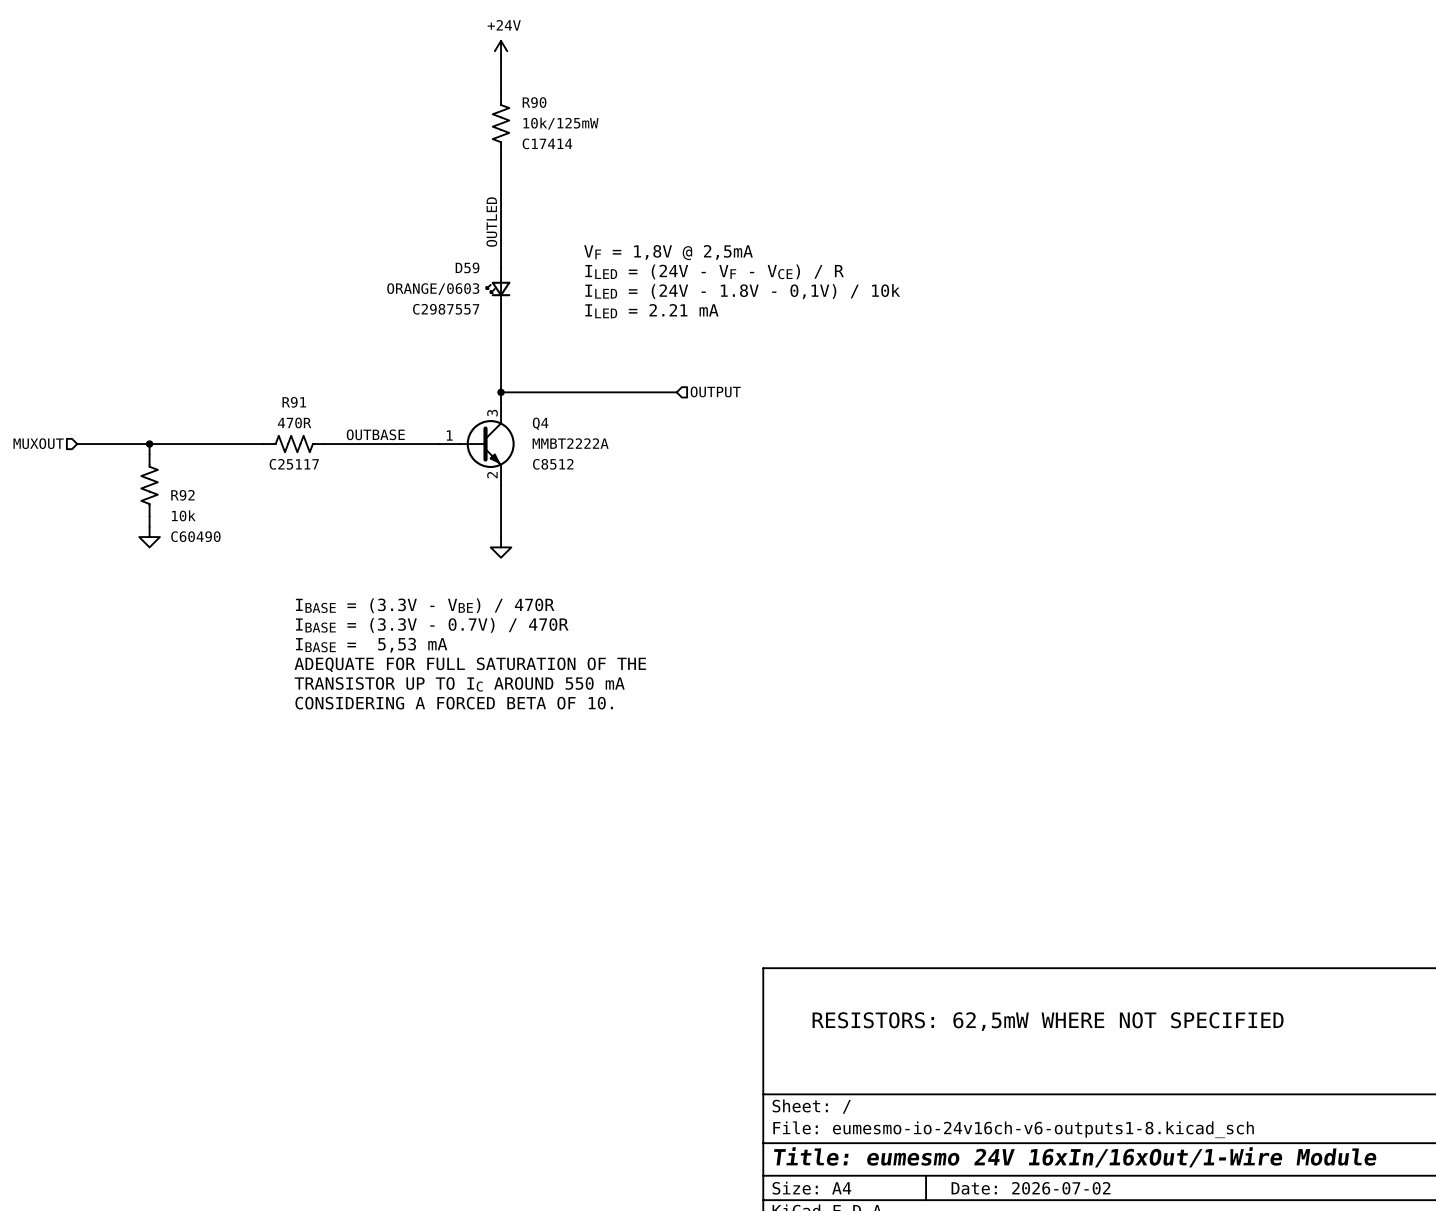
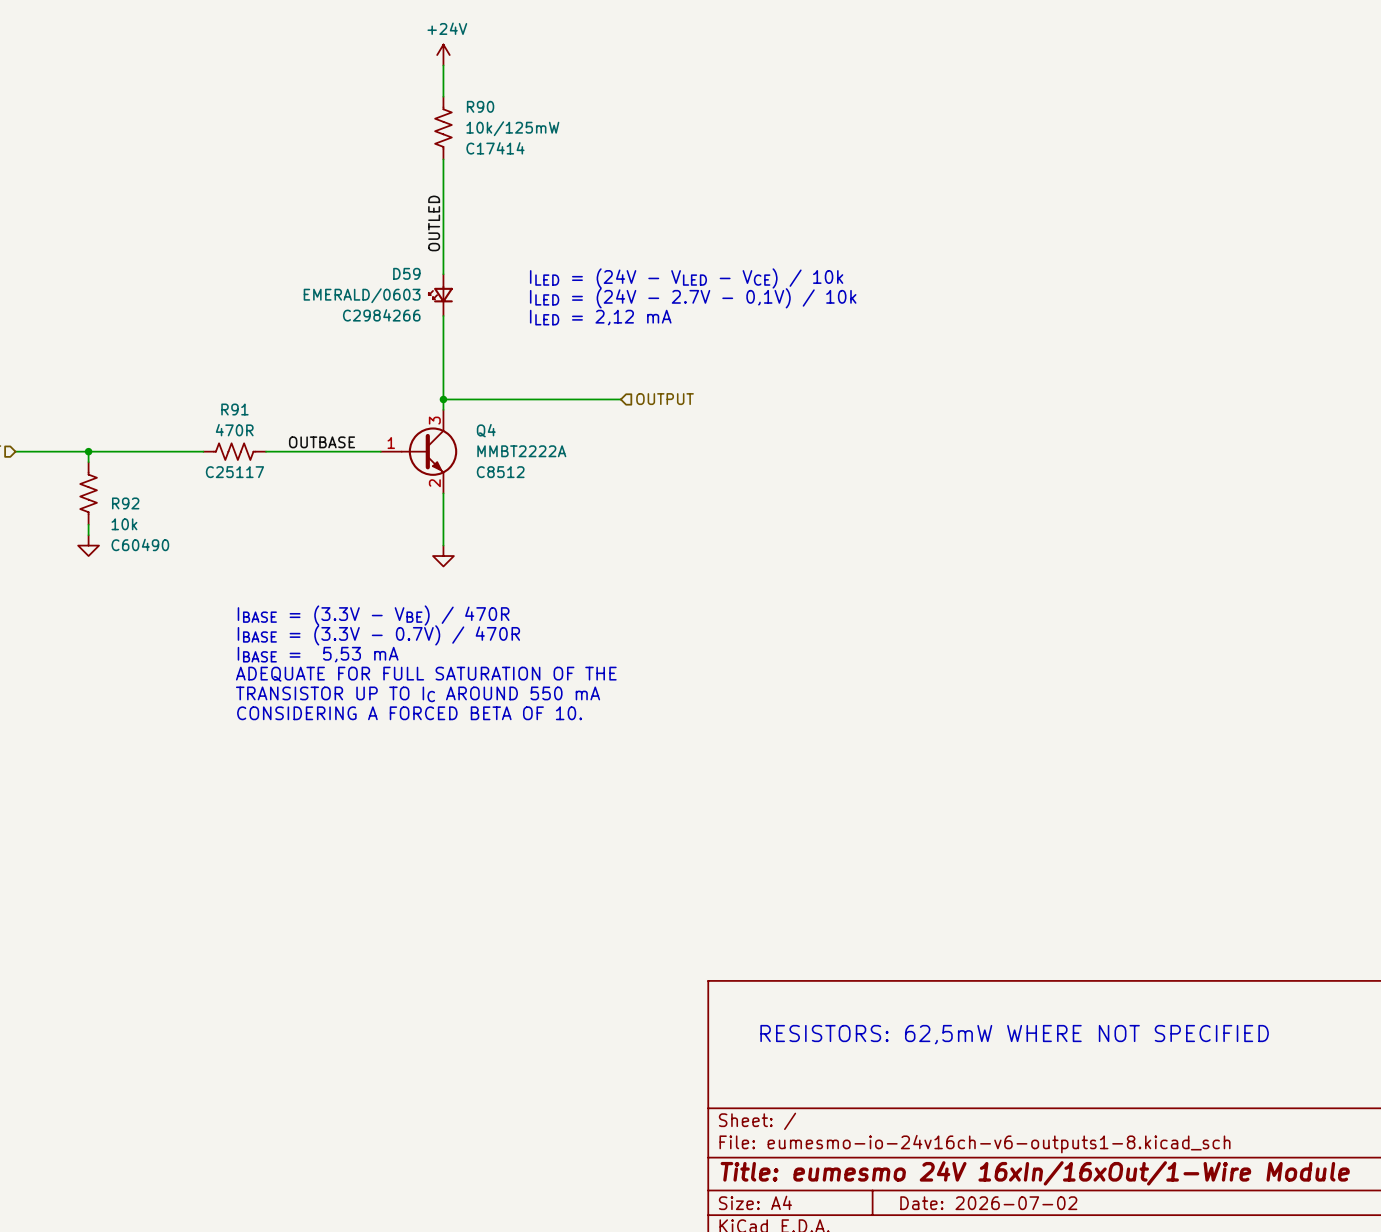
text: VF = 1,8V @ 2,5mA (668, 252) -> none
text: ILED = (24V - VF - VCE) / R (714, 271) -> ILED = (24V - VLED - VCE) / 10k (686, 278)
D59 value: ORANGE/0603 (433, 289) -> EMERALD/0603 (362, 295)
text: ILED = (24V - 1.8V - 0,1V) / 10k (742, 291) -> ILED = (24V - 2.7V - 0,1V) / 10k (693, 298)
D59 text: C2987557 (446, 309) -> C2984266 (381, 315)
text: ILED = 2.21 mA (651, 311) -> ILED = 2,12 mA (600, 317)

